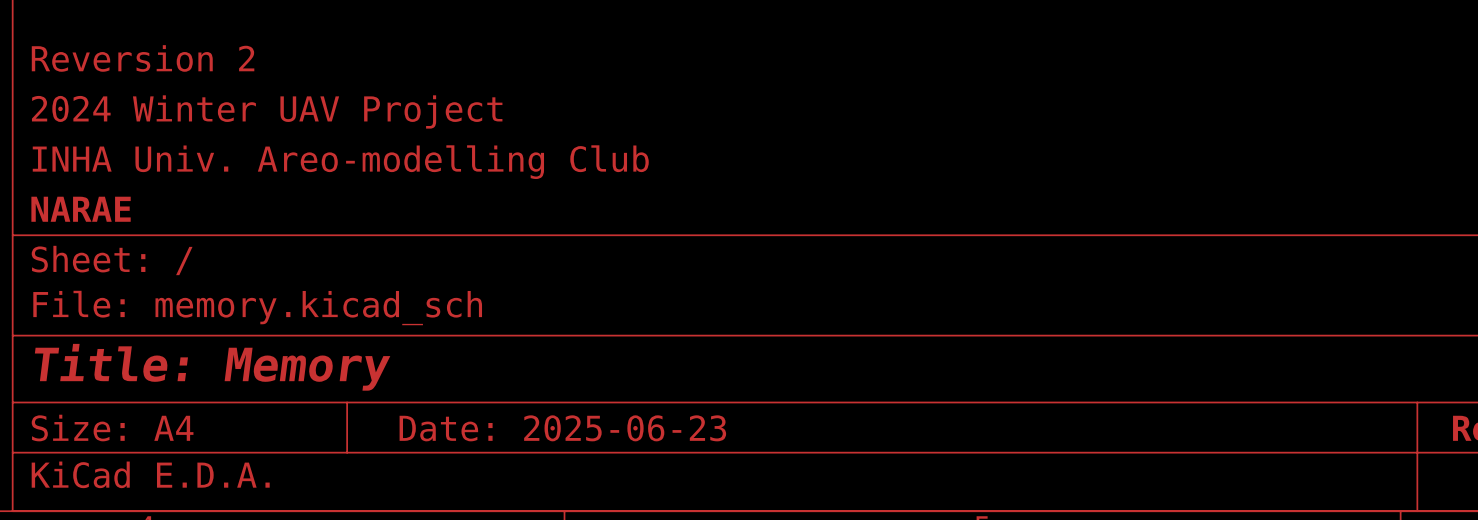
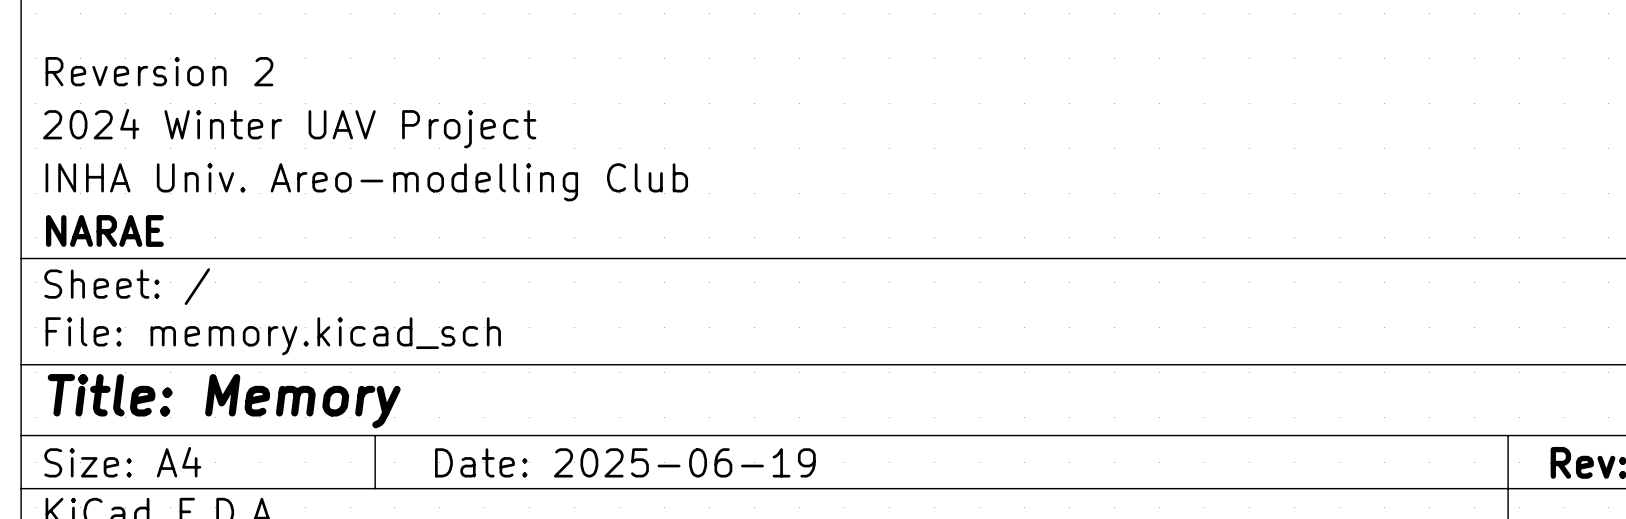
title block: Date: 2025-06-23 (562, 428) -> Date: 2025-06-19 (625, 462)

